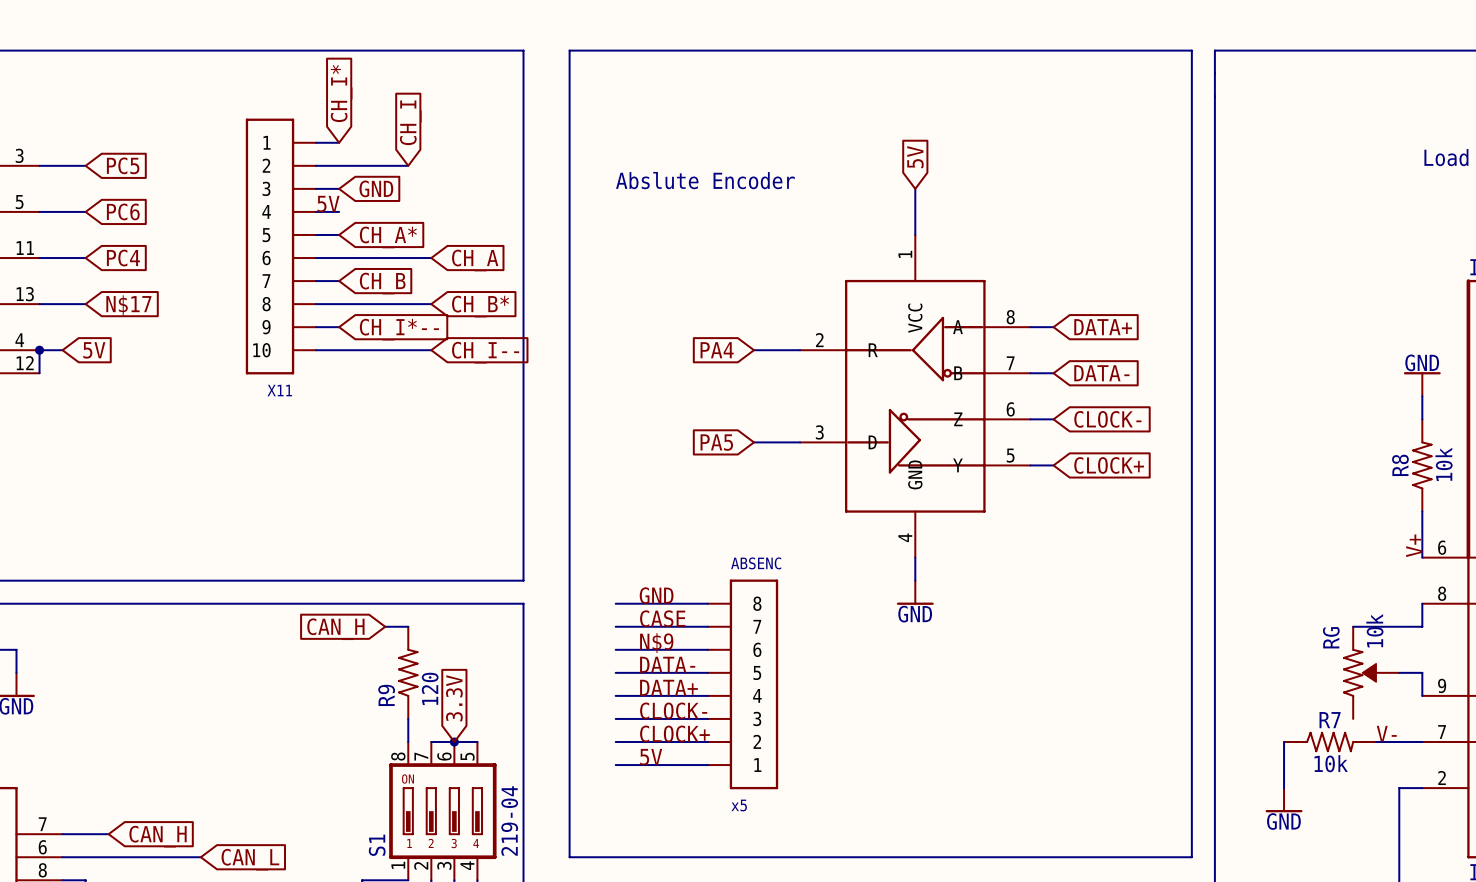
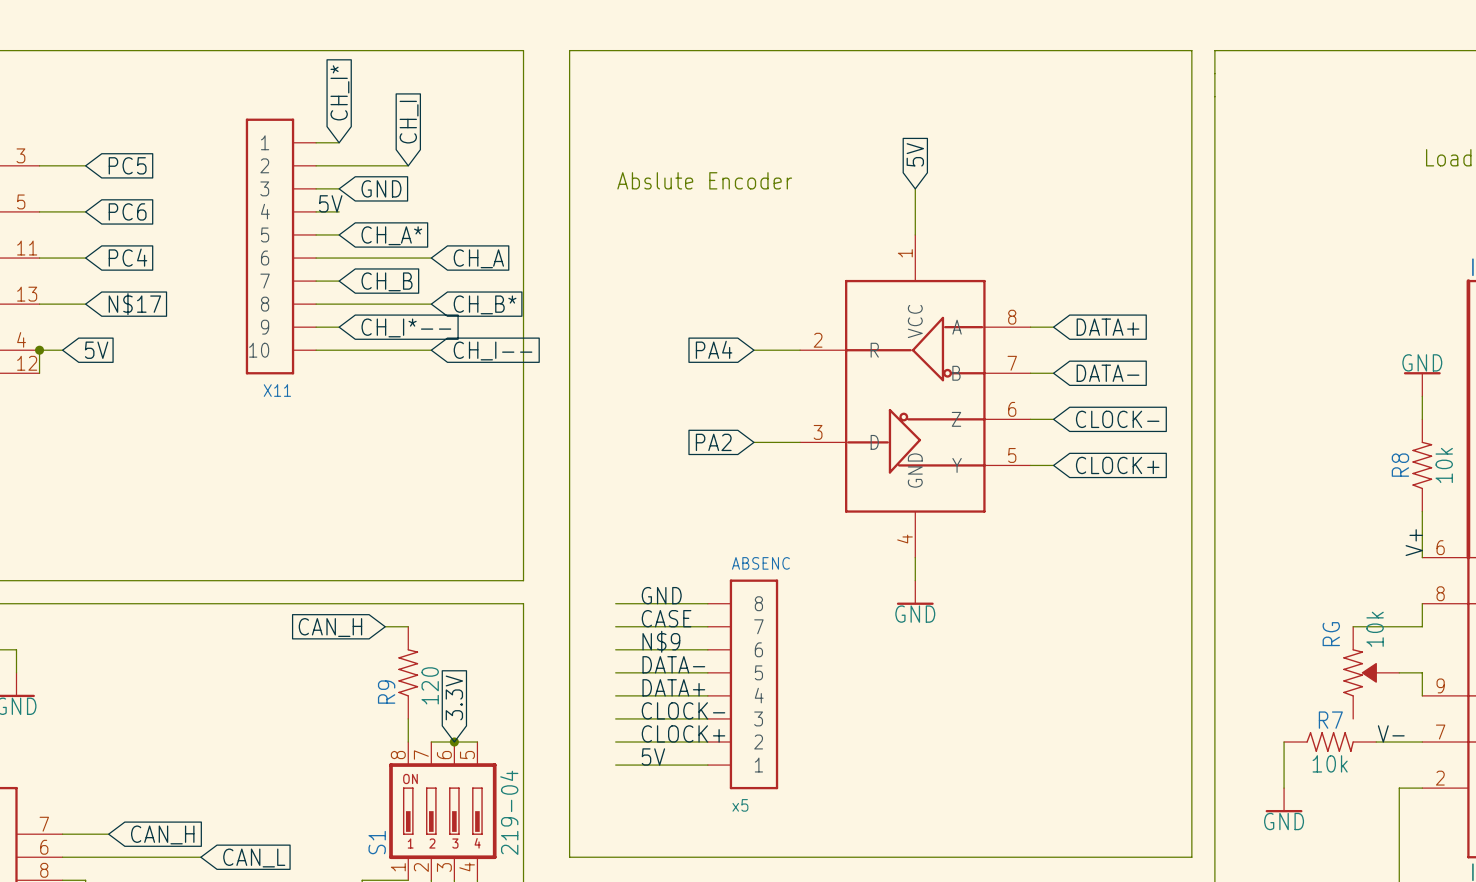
global label: PA5 (716, 442) -> PA2 (713, 442)

